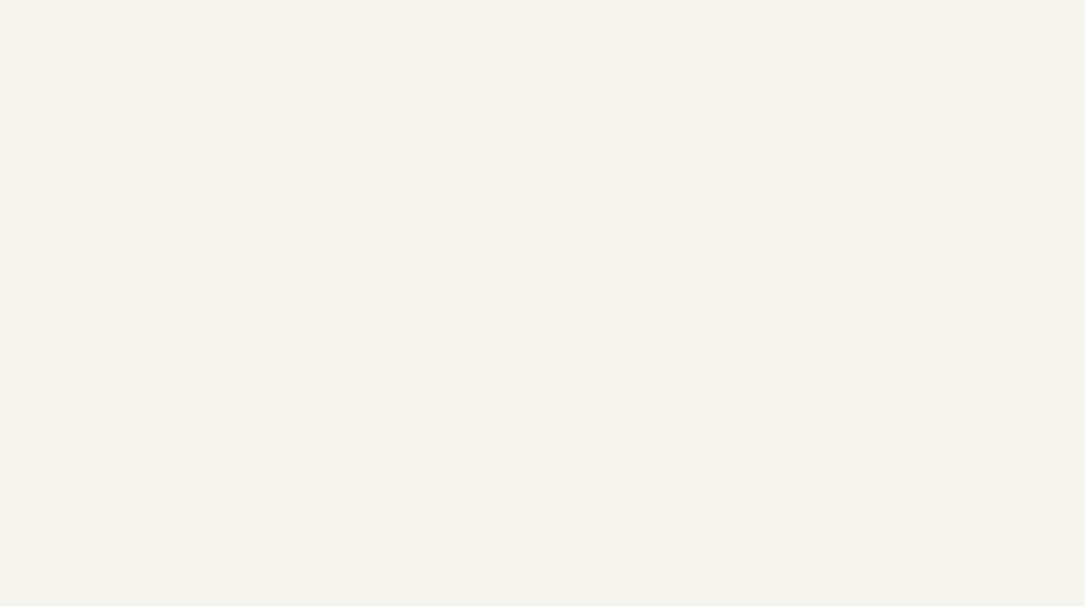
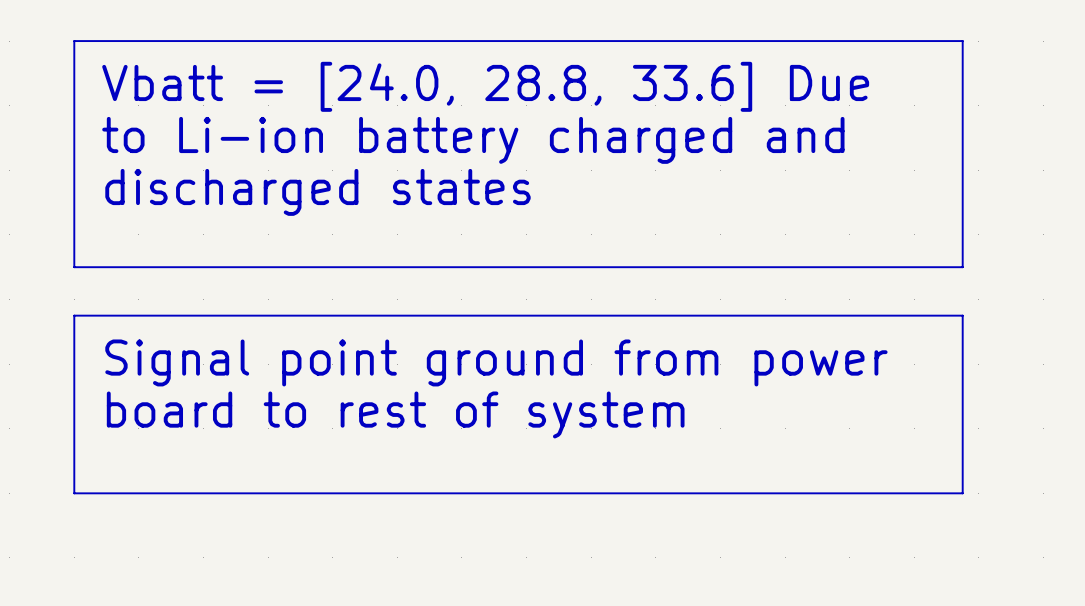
line: none -> (74, 41) (74, 267) (962, 267) (962, 41) (74, 41)
text: none -> Vbatt = [24.0, 28.8, 33.6] Due (485, 86)
text: none -> to Li-ion battery charged and (473, 140)
text: none -> discharged states (317, 192)
line: none -> (74, 315) (962, 315) (962, 493) (74, 493) (74, 315)
text: none -> Signal point ground from power (496, 362)
text: none -> board to rest of system (395, 414)

